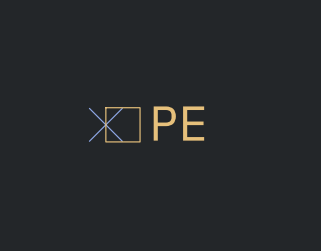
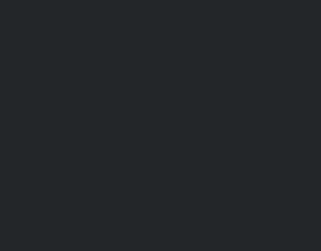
hierarchical label: PE (178, 123) -> none
no-connect mark: (105, 124) -> none

